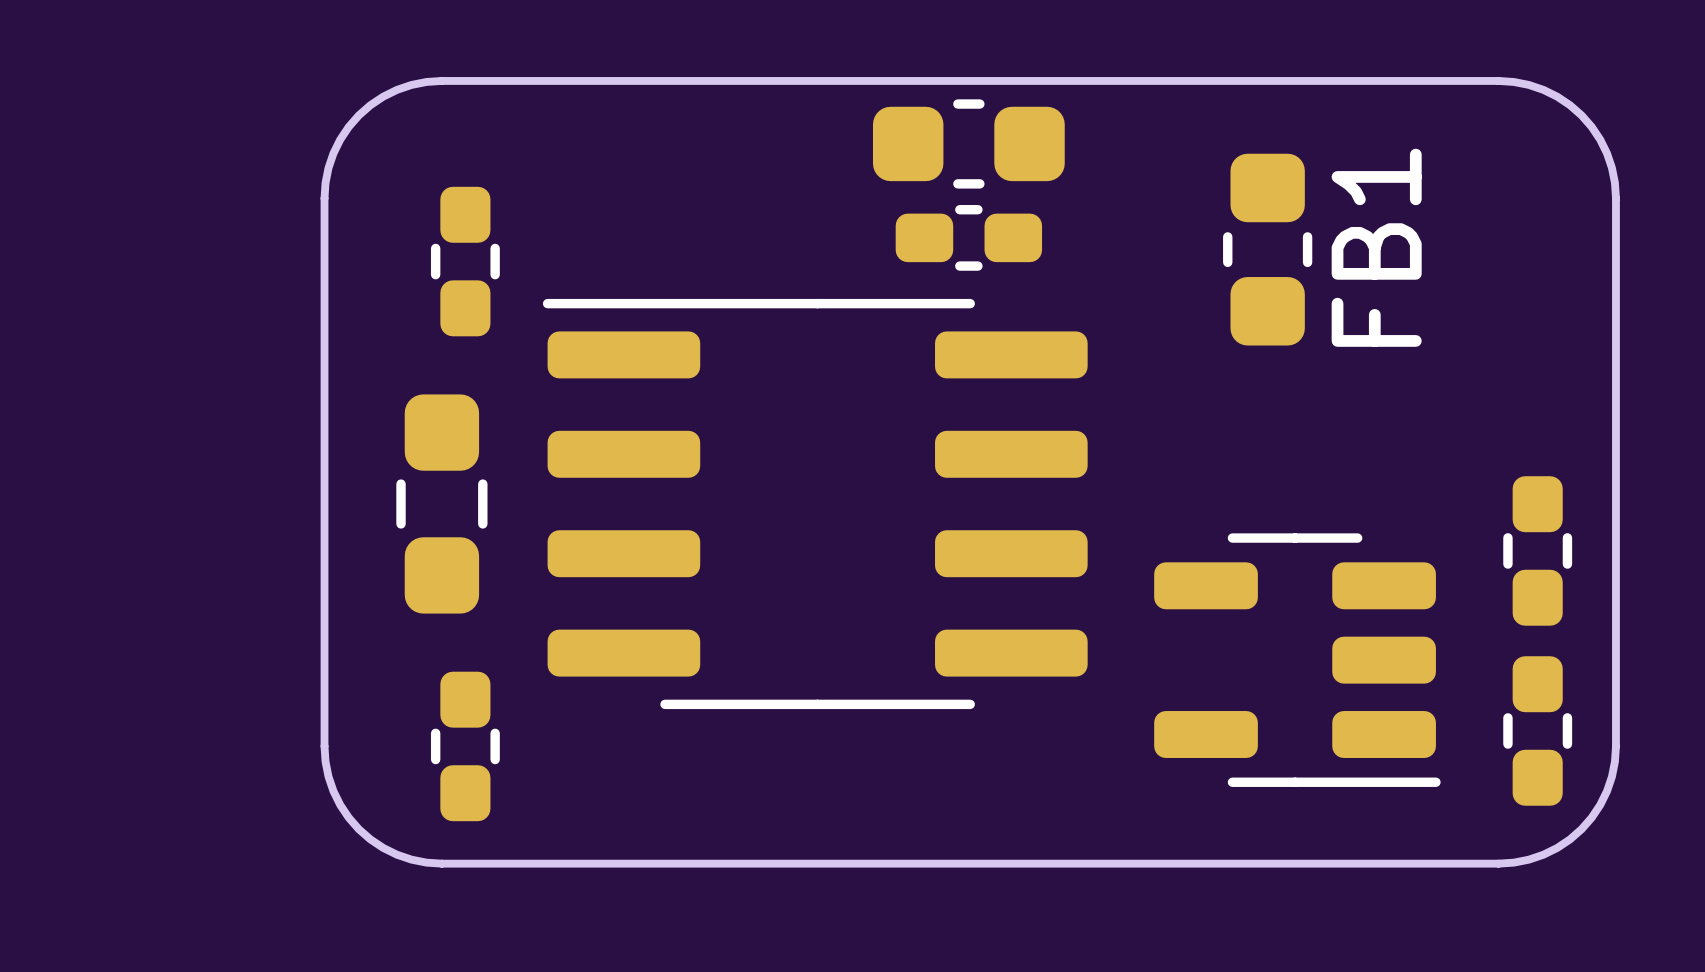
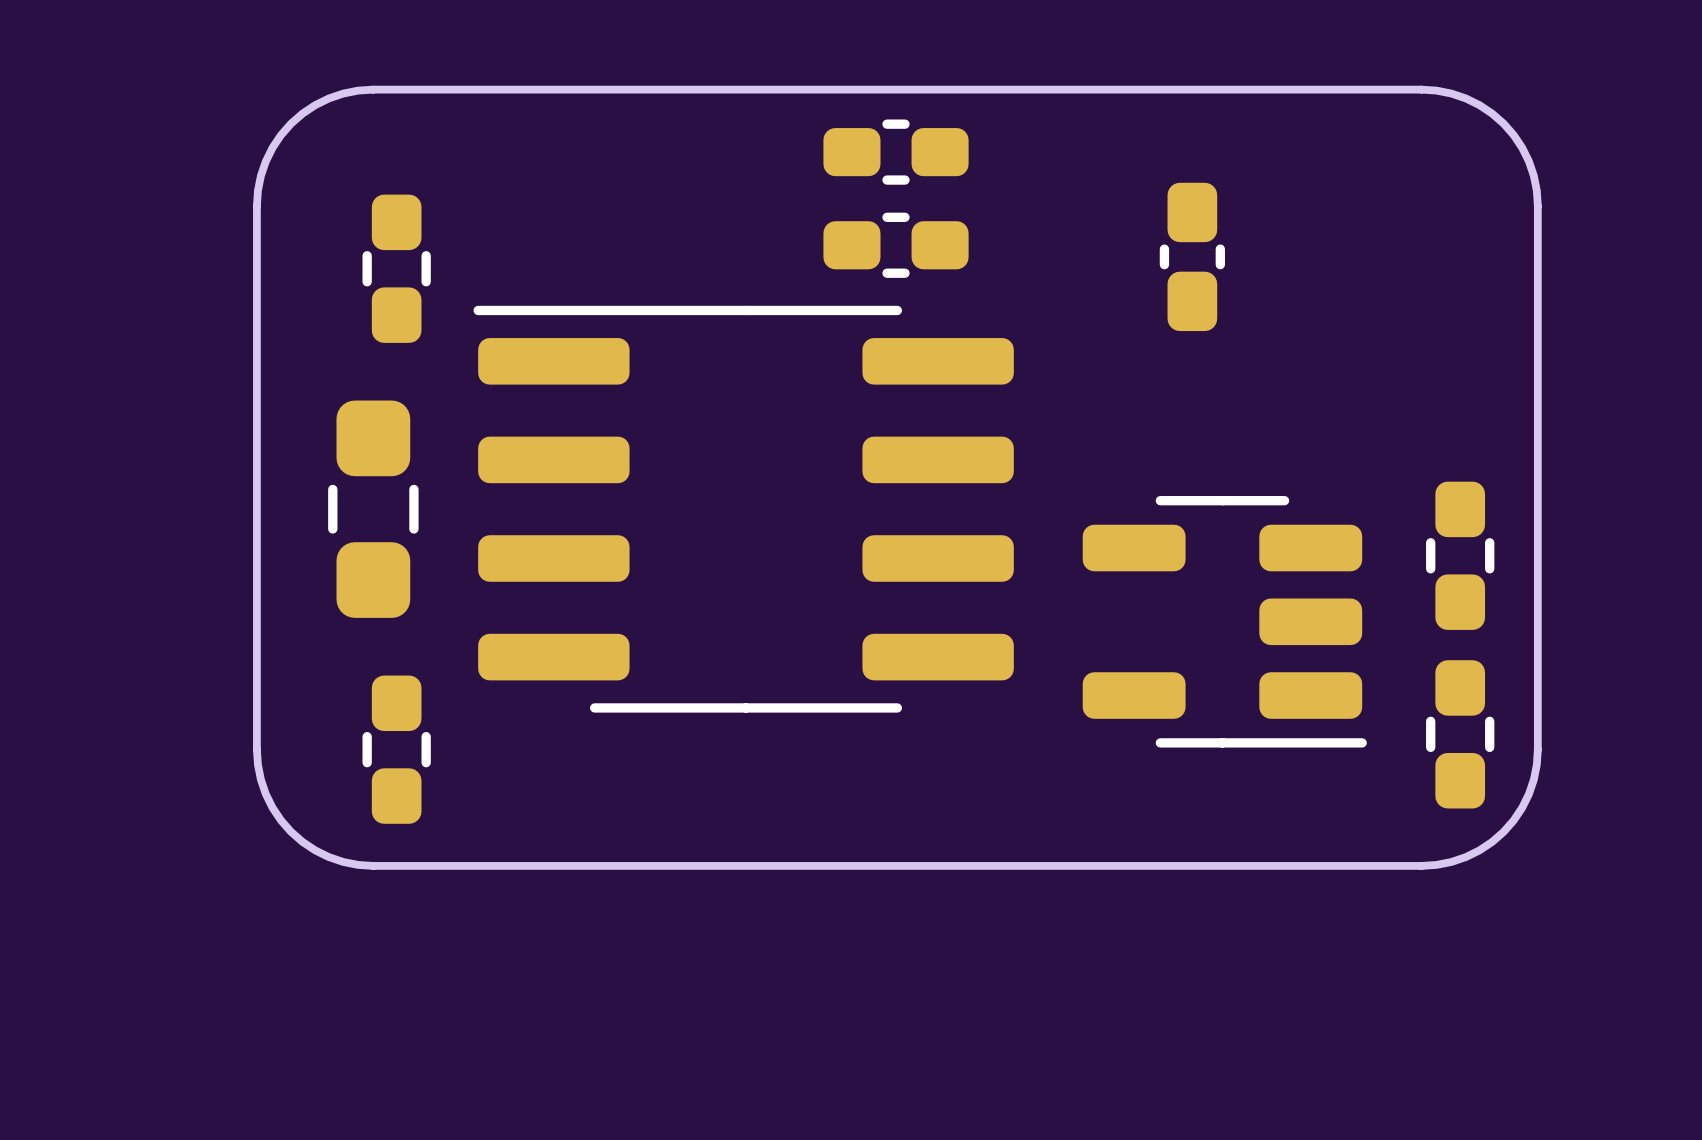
part footprint: [872, 99, 1065, 189] -> [823, 119, 969, 185]
FB1: (1267, 249) -> none
part: none -> (1192, 256)
part position: (1297, 660) -> (1224, 621)

